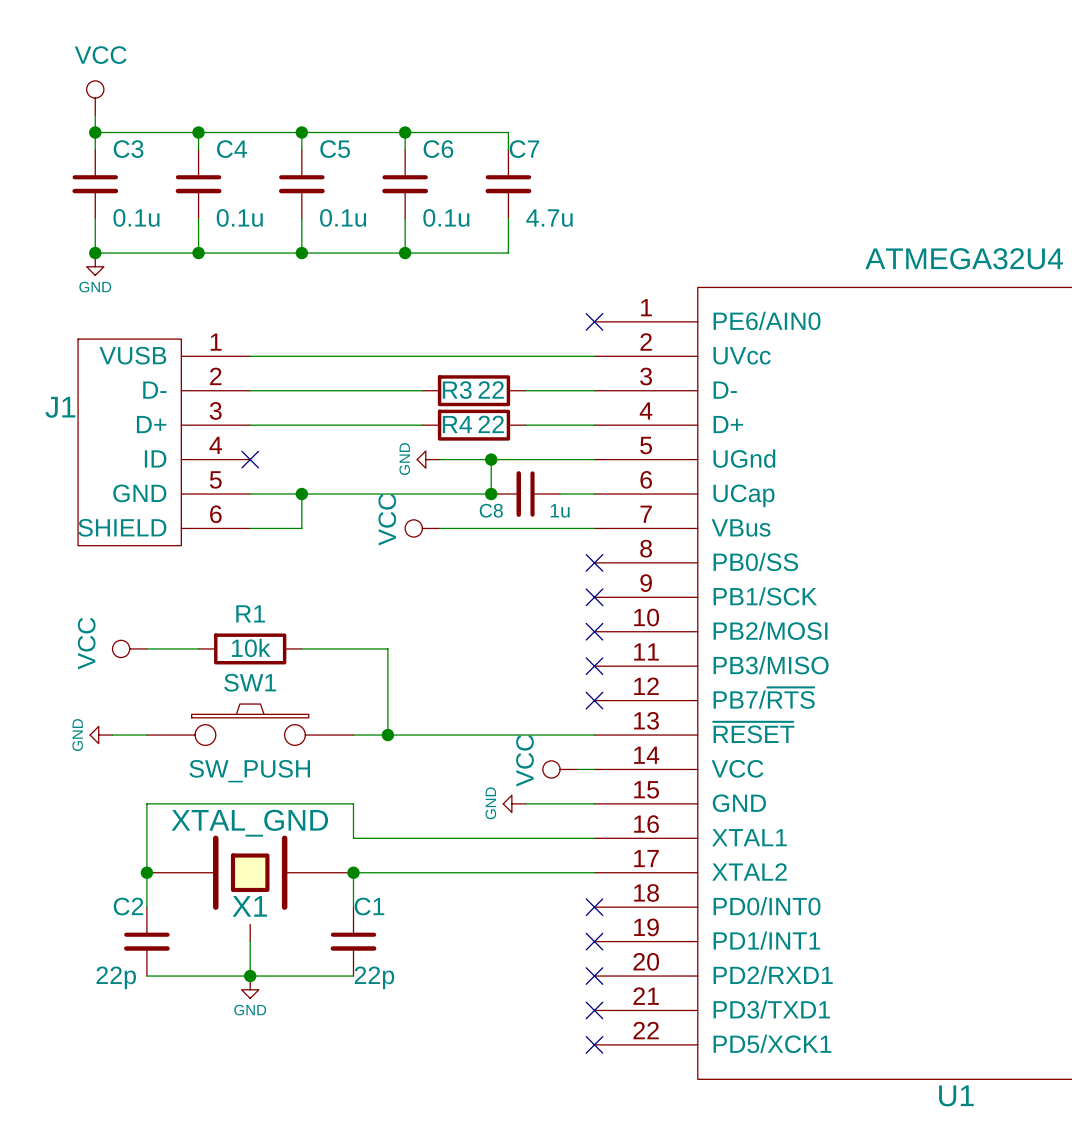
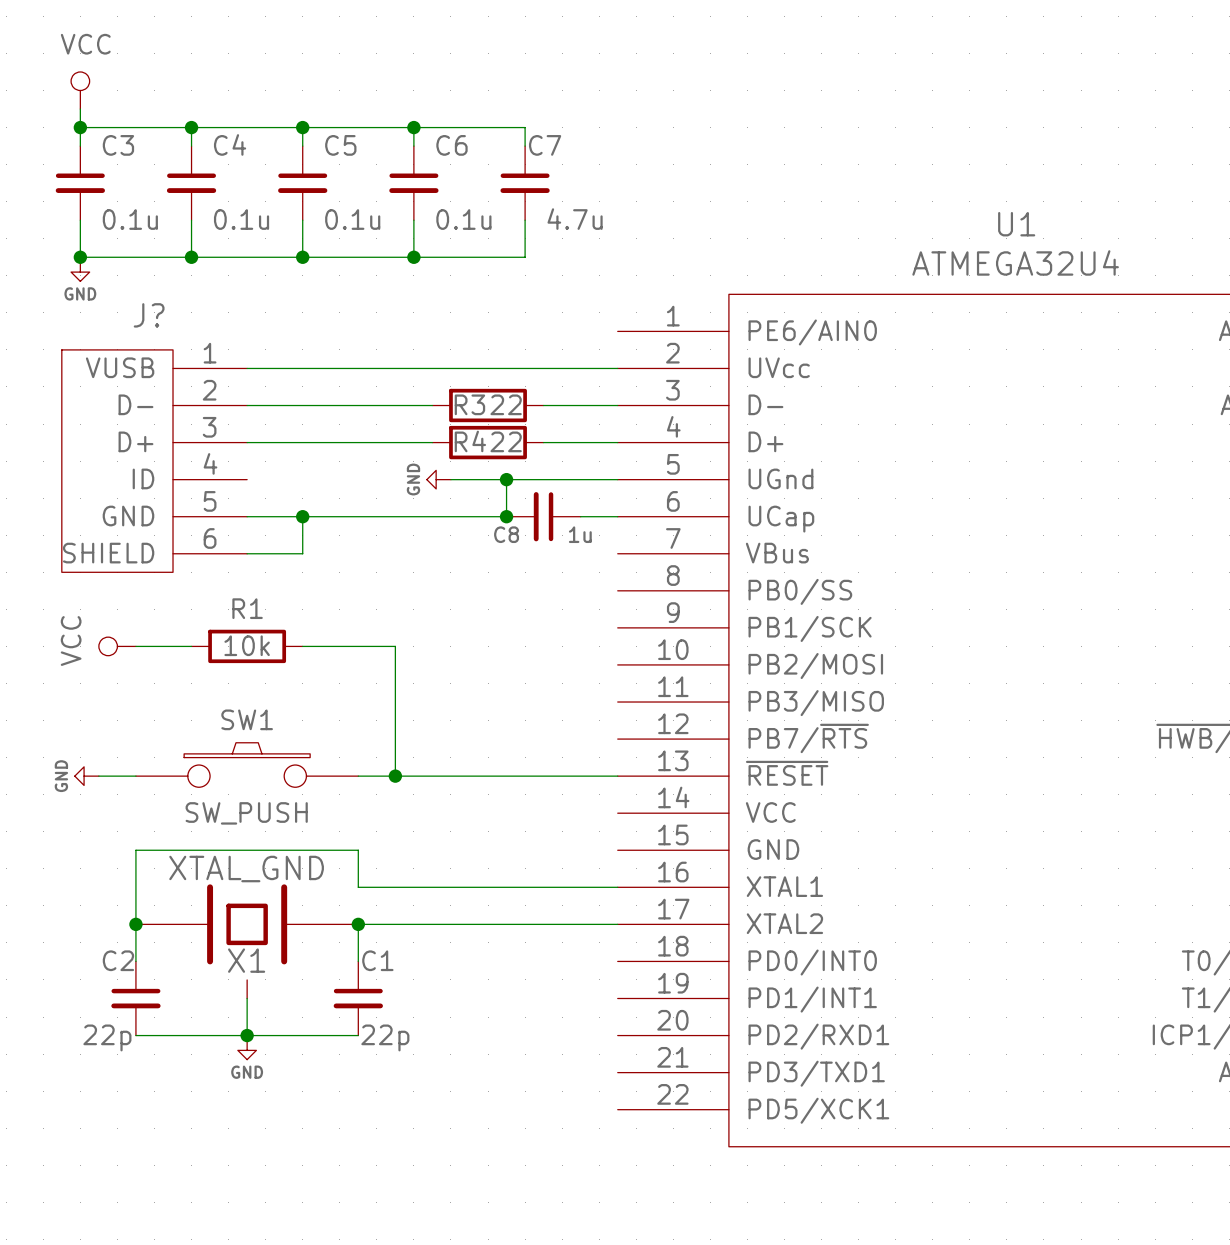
no-connect mark: (594, 321) -> none
J1 name: J1 (60, 407) -> J? (149, 315)
no-connect mark: (250, 459) -> none
power symbol: VCC (422, 528) -> none
wire: (439, 528) (594, 528) -> none
no-connect mark: (594, 562) -> none
no-connect mark: (594, 597) -> none
no-connect mark: (594, 631) -> none
power symbol position: VCC (129, 648) -> VCC (117, 646)
wire: (146, 648) (198, 648) -> (135, 646) (191, 646)
R1 position: (250, 648) -> (247, 646)
wire: (301, 648) (387, 648) -> (302, 646) (395, 646) (395, 683)
no-connect mark: (594, 666) -> none
no-connect mark: (594, 700) -> none
power symbol: VCC (560, 769) -> none
wire: (577, 769) (594, 769) -> none
power symbol: GND (514, 803) -> none
wire: (525, 803) (594, 803) -> none
no-connect mark: (594, 907) -> none
no-connect mark: (594, 941) -> none
no-connect mark: (594, 976) -> none
no-connect mark: (594, 1010) -> none
no-connect mark: (594, 1044) -> none
U1 name position: U1 (956, 1095) -> U1 (1016, 224)

